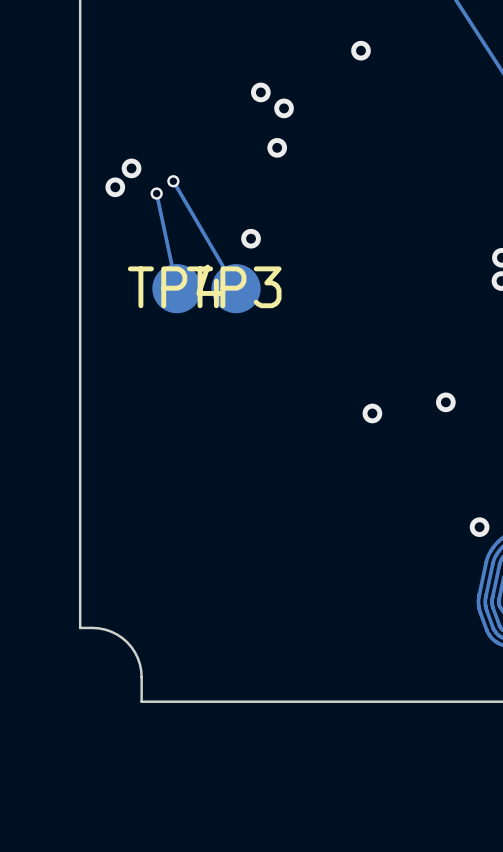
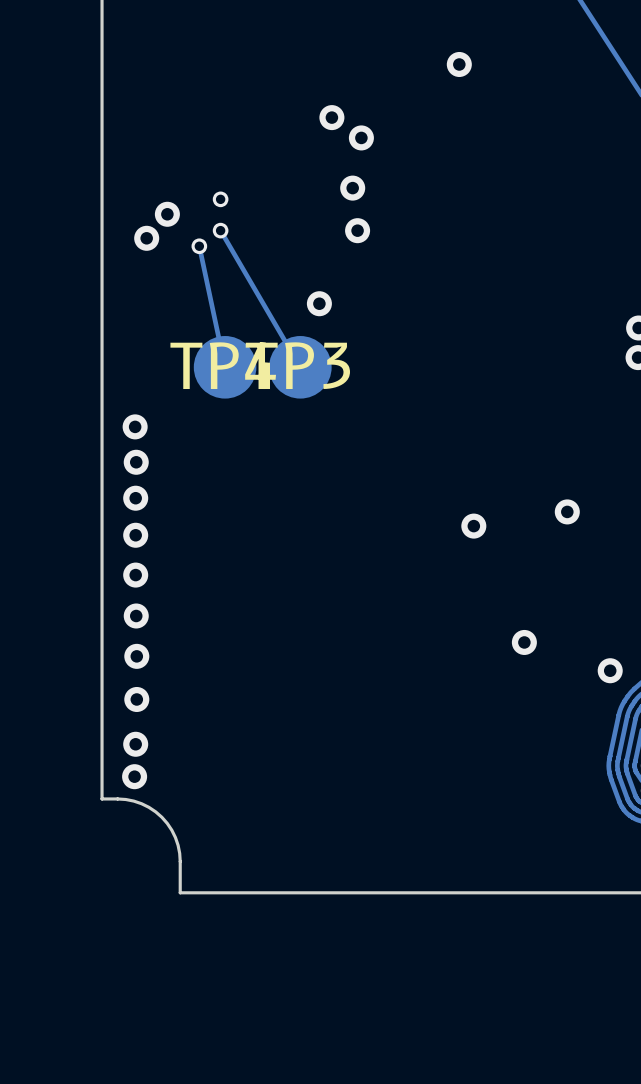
via: none -> (220, 199)
via: none -> (357, 230)
via: none -> (135, 426)
via: none -> (136, 462)
via: none -> (135, 498)
via: none -> (135, 535)
via: none -> (135, 575)
via: none -> (136, 615)
via: none -> (524, 642)
via: none -> (136, 656)
via: none -> (136, 699)
via: none -> (135, 744)
via: none -> (134, 776)

